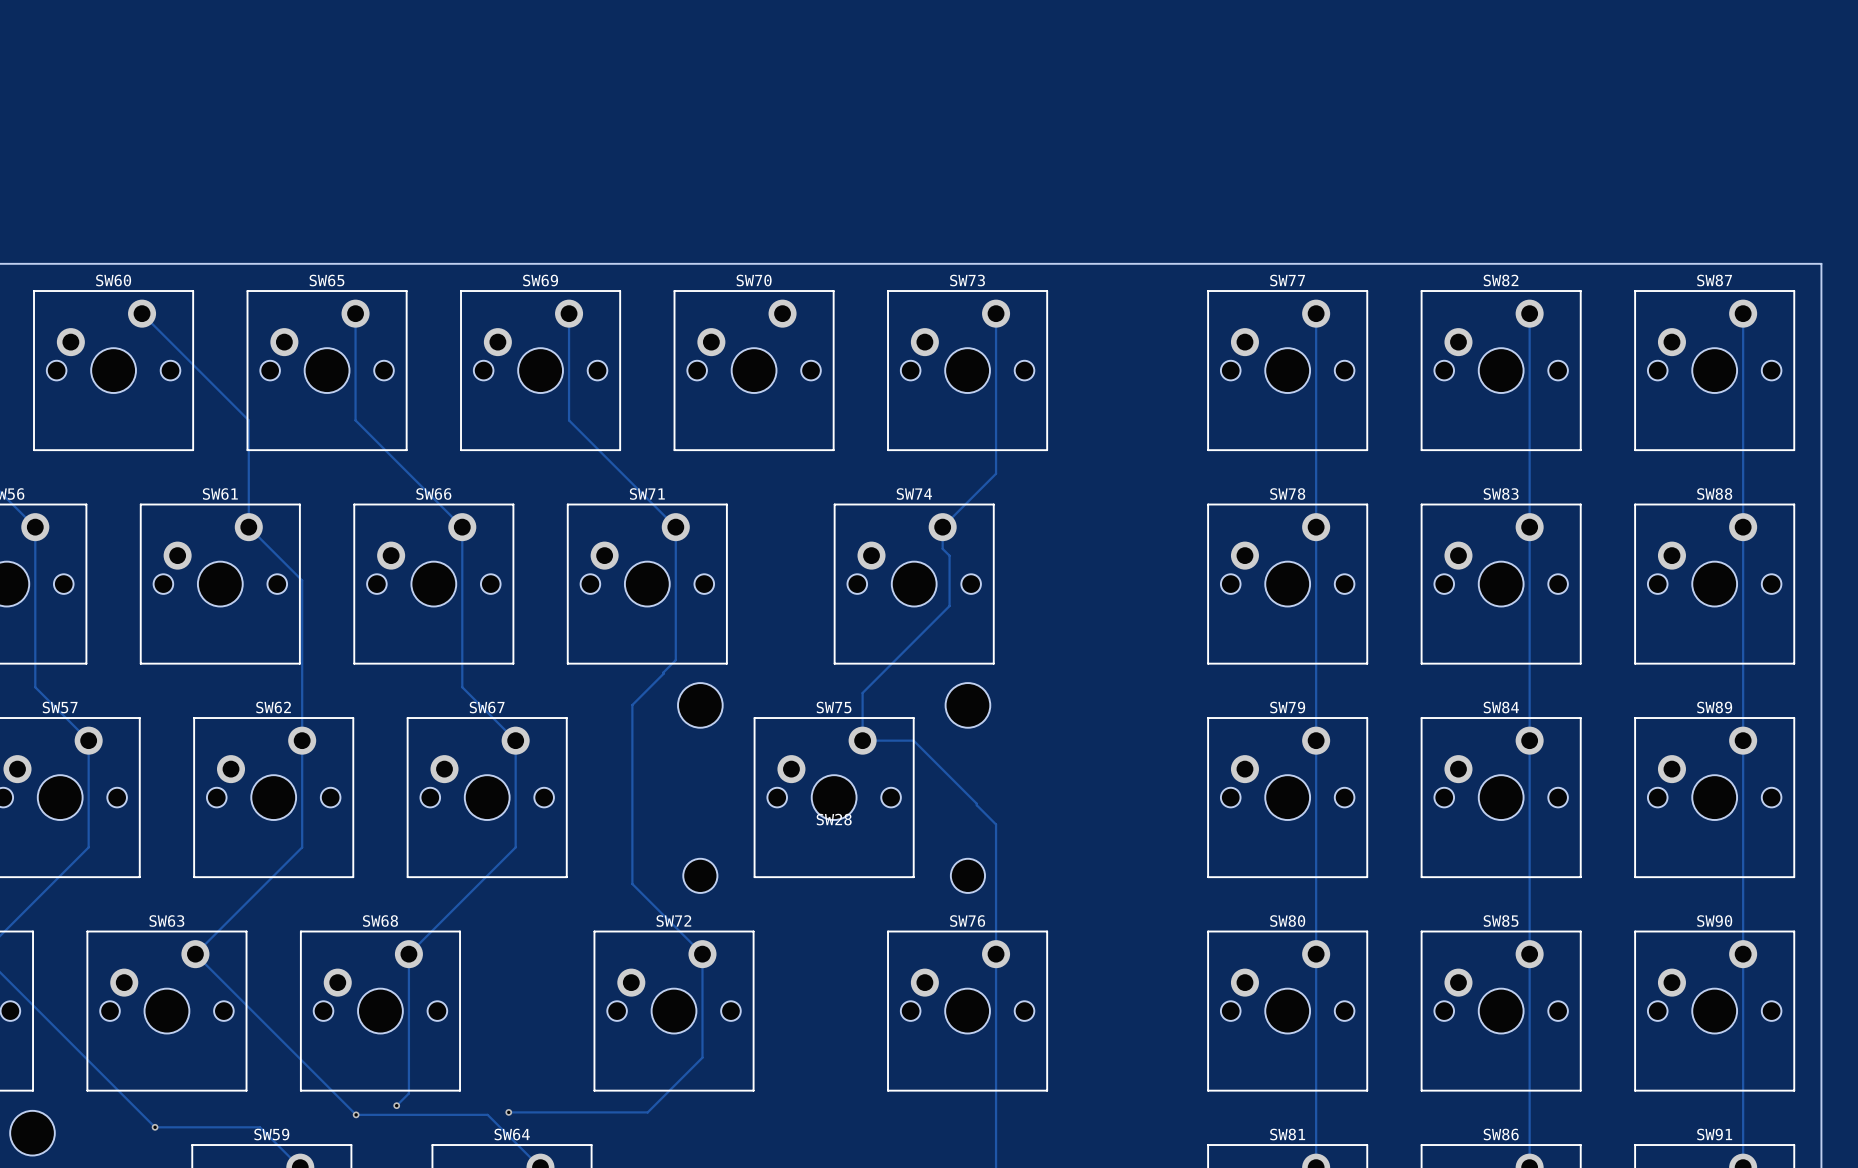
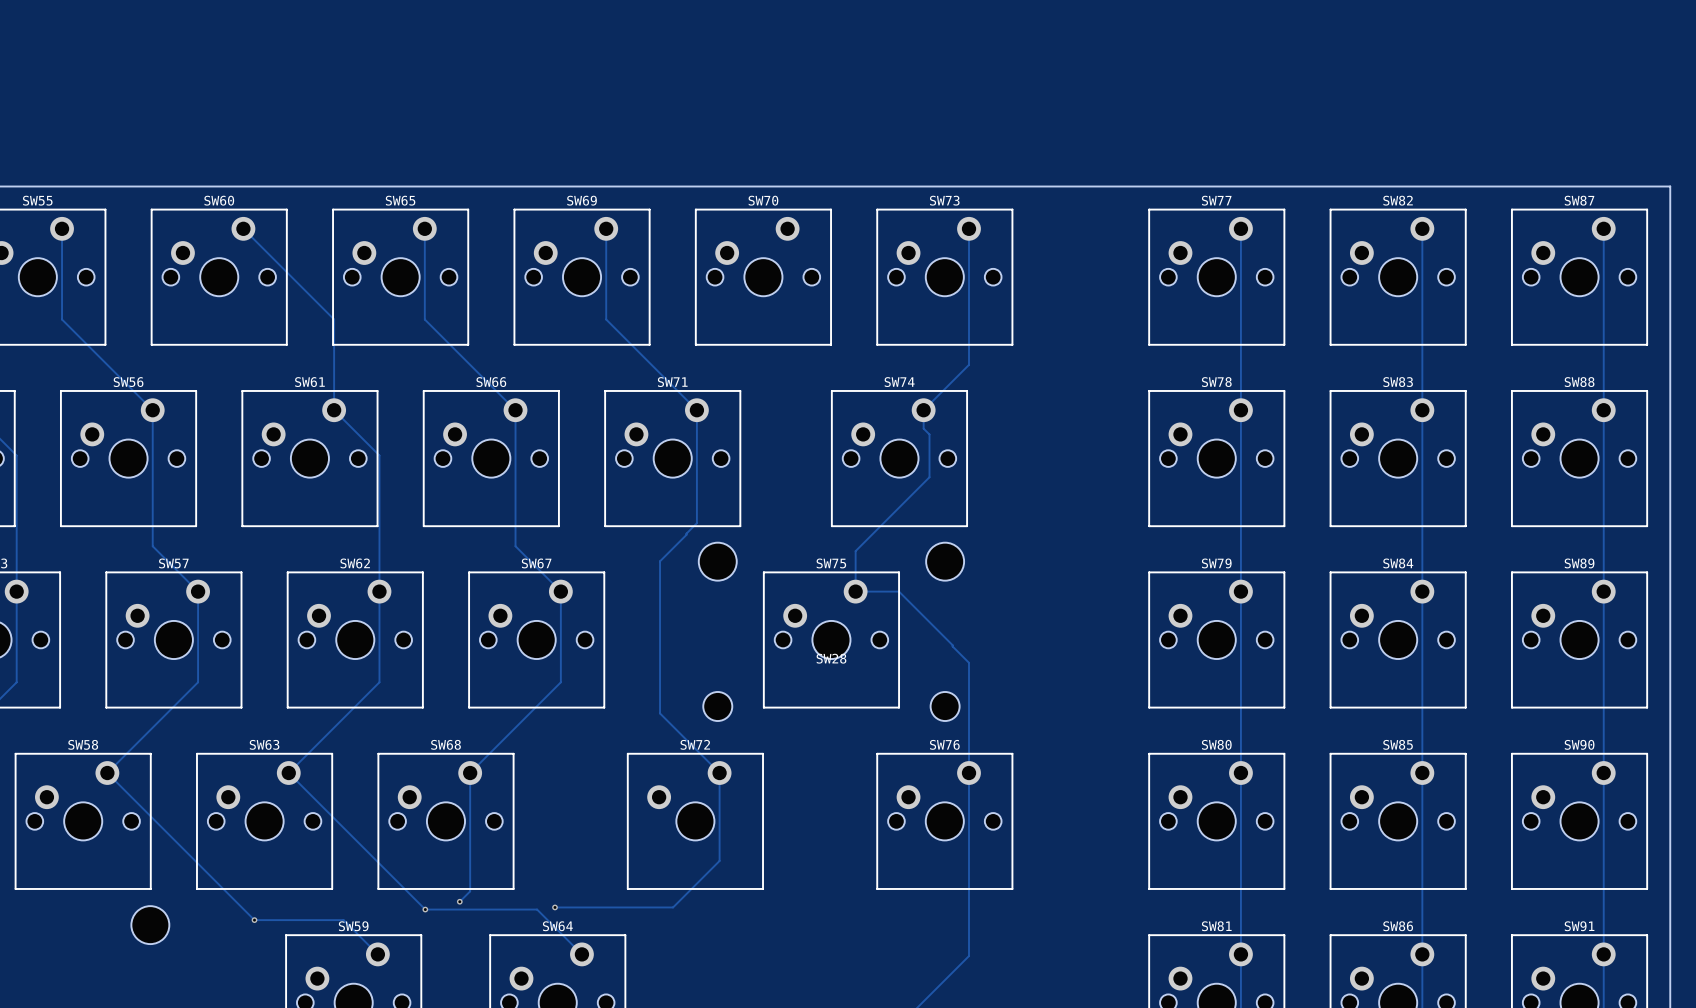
SW72 footprint: [593, 930, 755, 1092] -> [627, 753, 764, 890]

